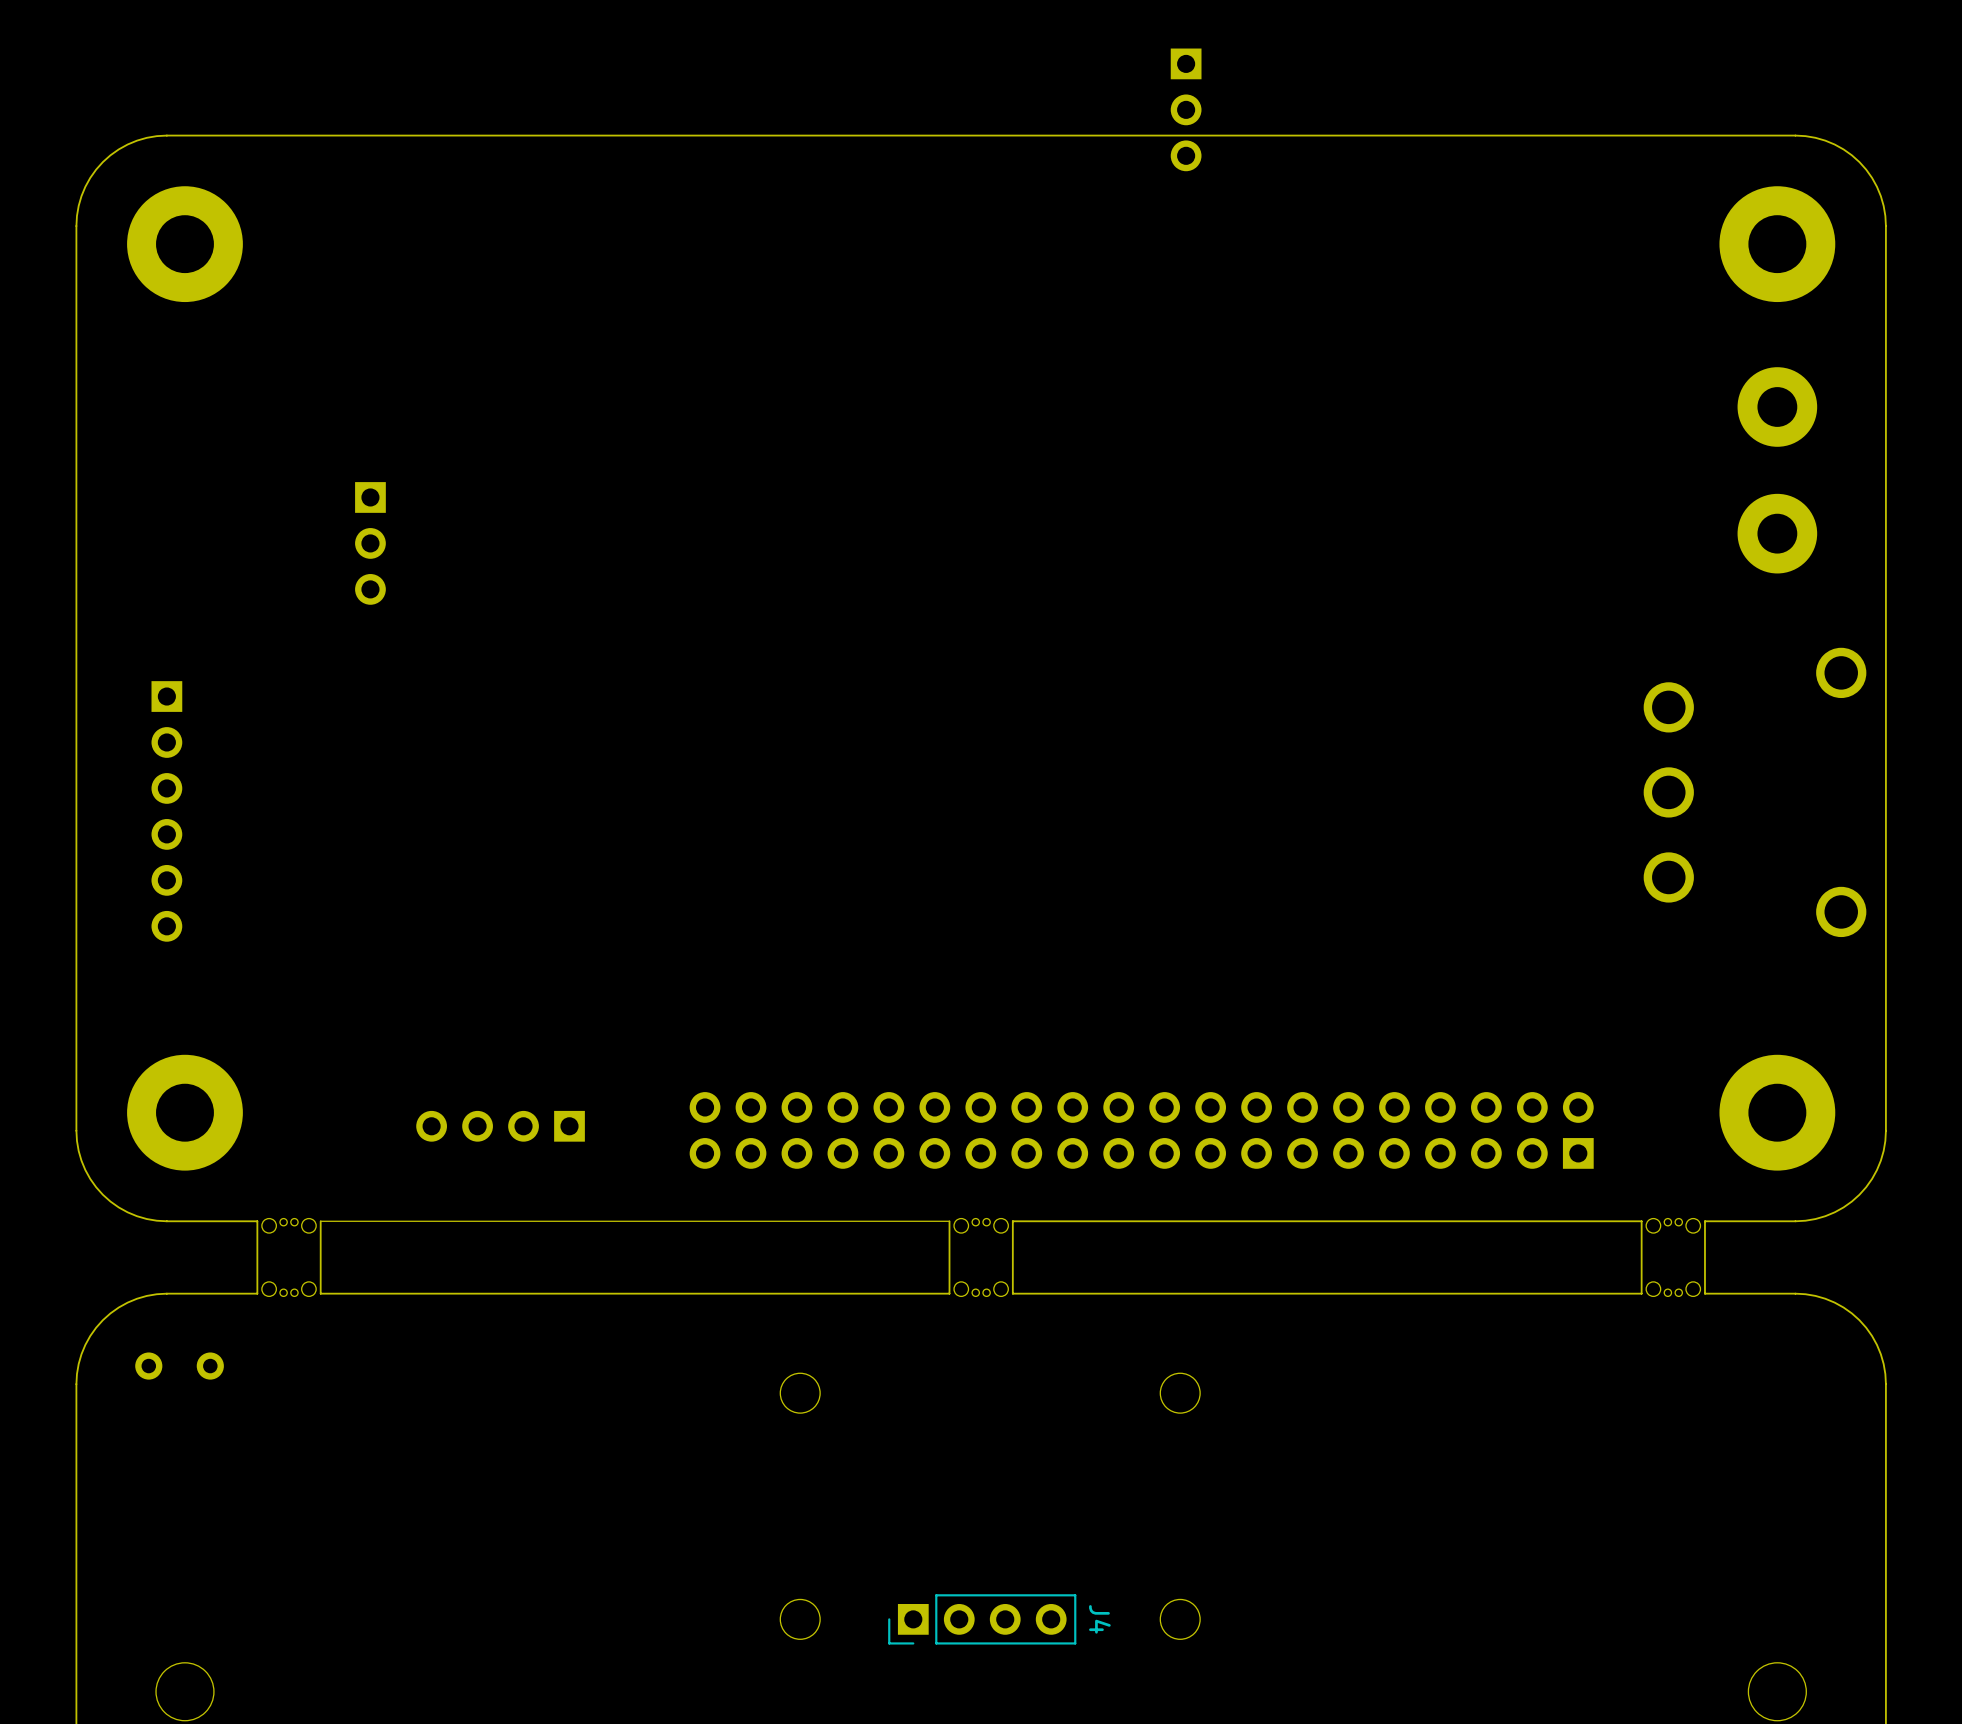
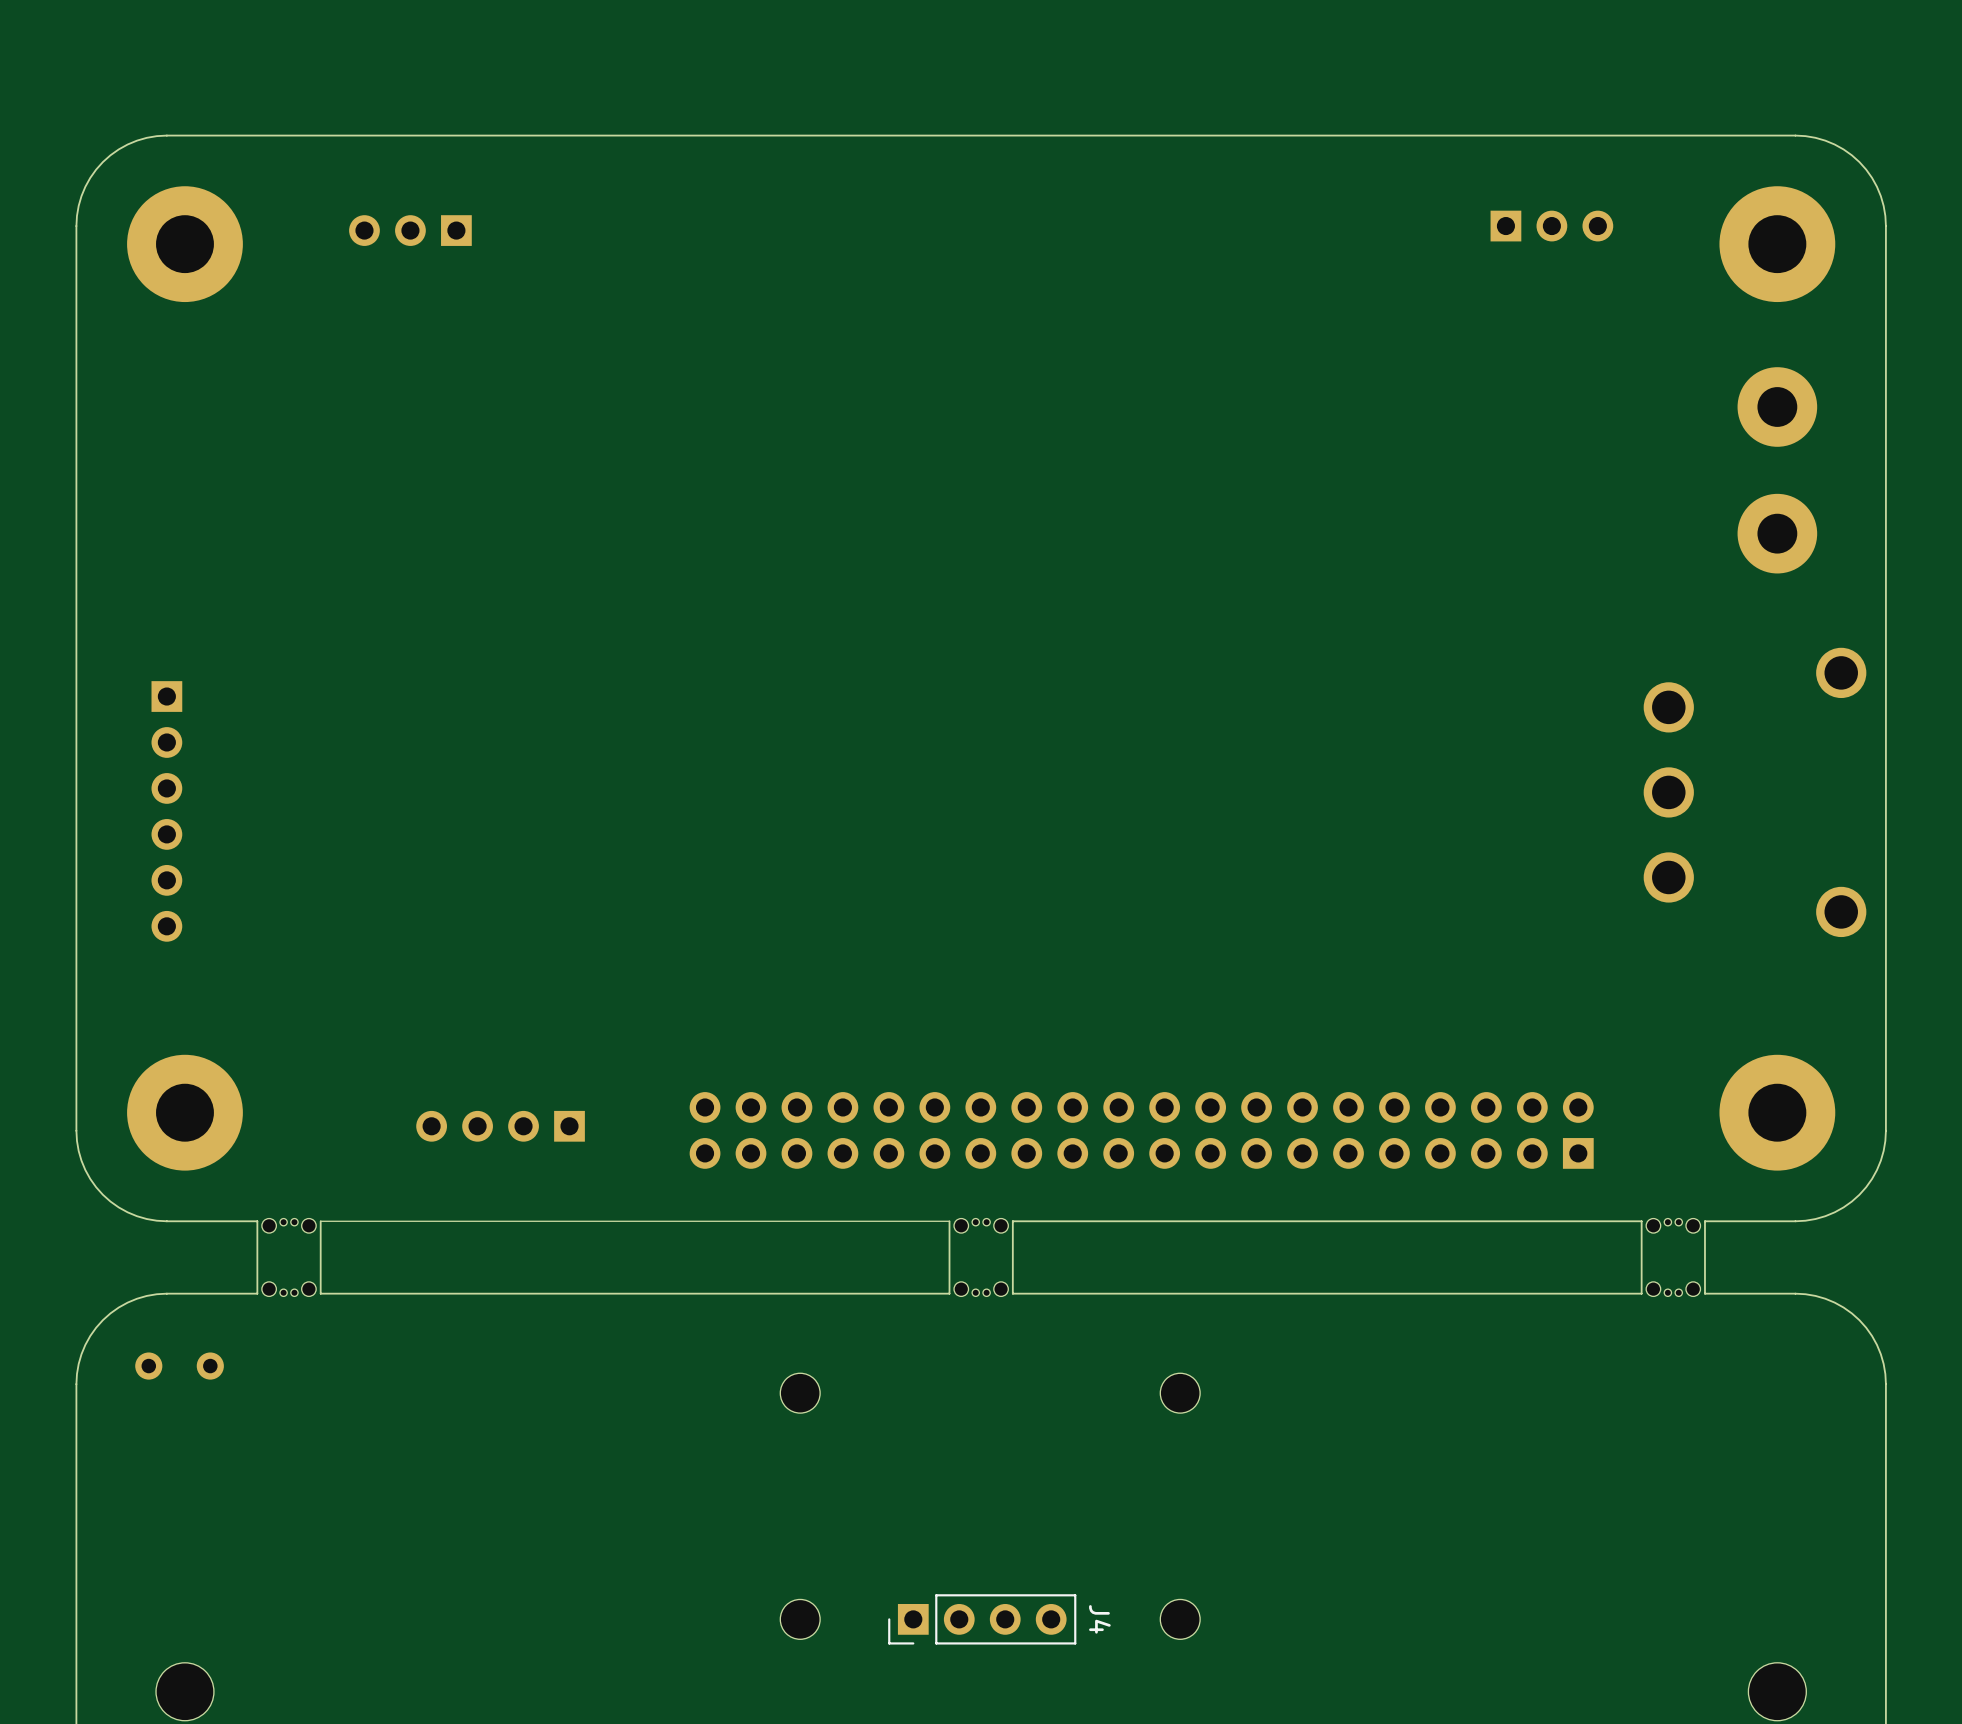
part rotation: 0° (1186, 109) -> 90° counterclockwise (1551, 226)
part position: (1186, 109) -> (1551, 226)
part rotation: 0° (370, 543) -> 90° clockwise (410, 230)
part position: (370, 543) -> (410, 230)

